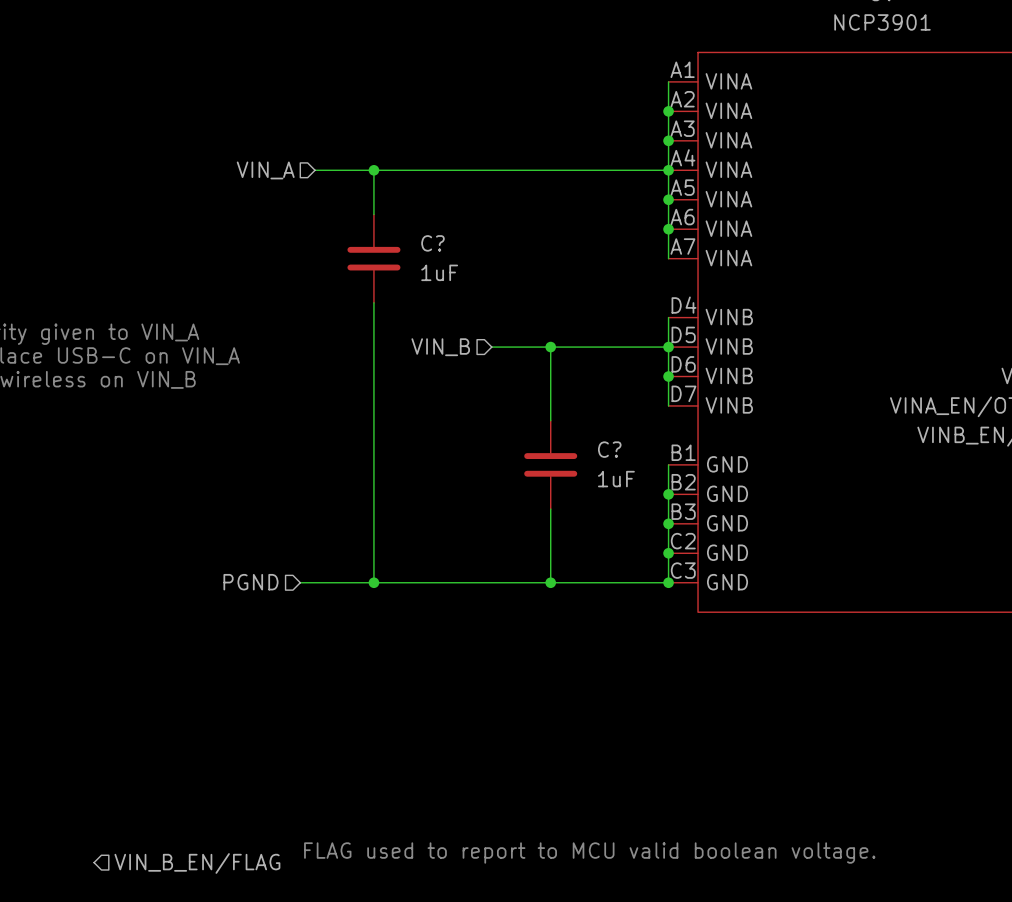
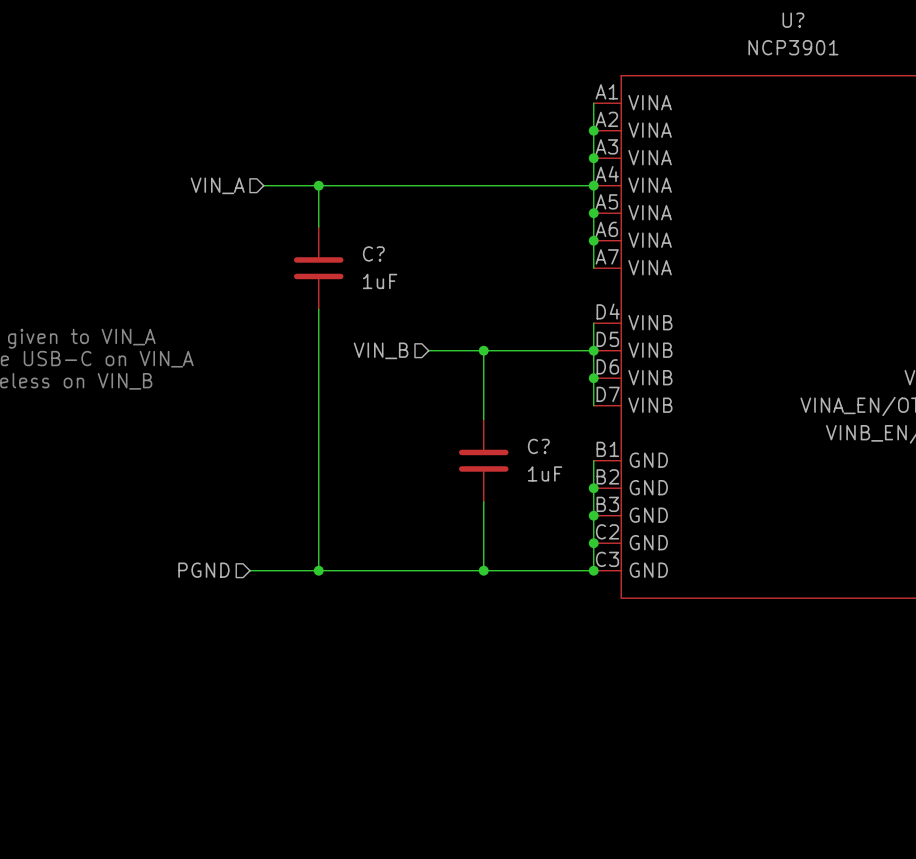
text: FLAG used to report to MCU valid boolean voltage. (589, 853) -> none
hierarchical label: VIN_B_EN/FLAG (197, 863) -> none

